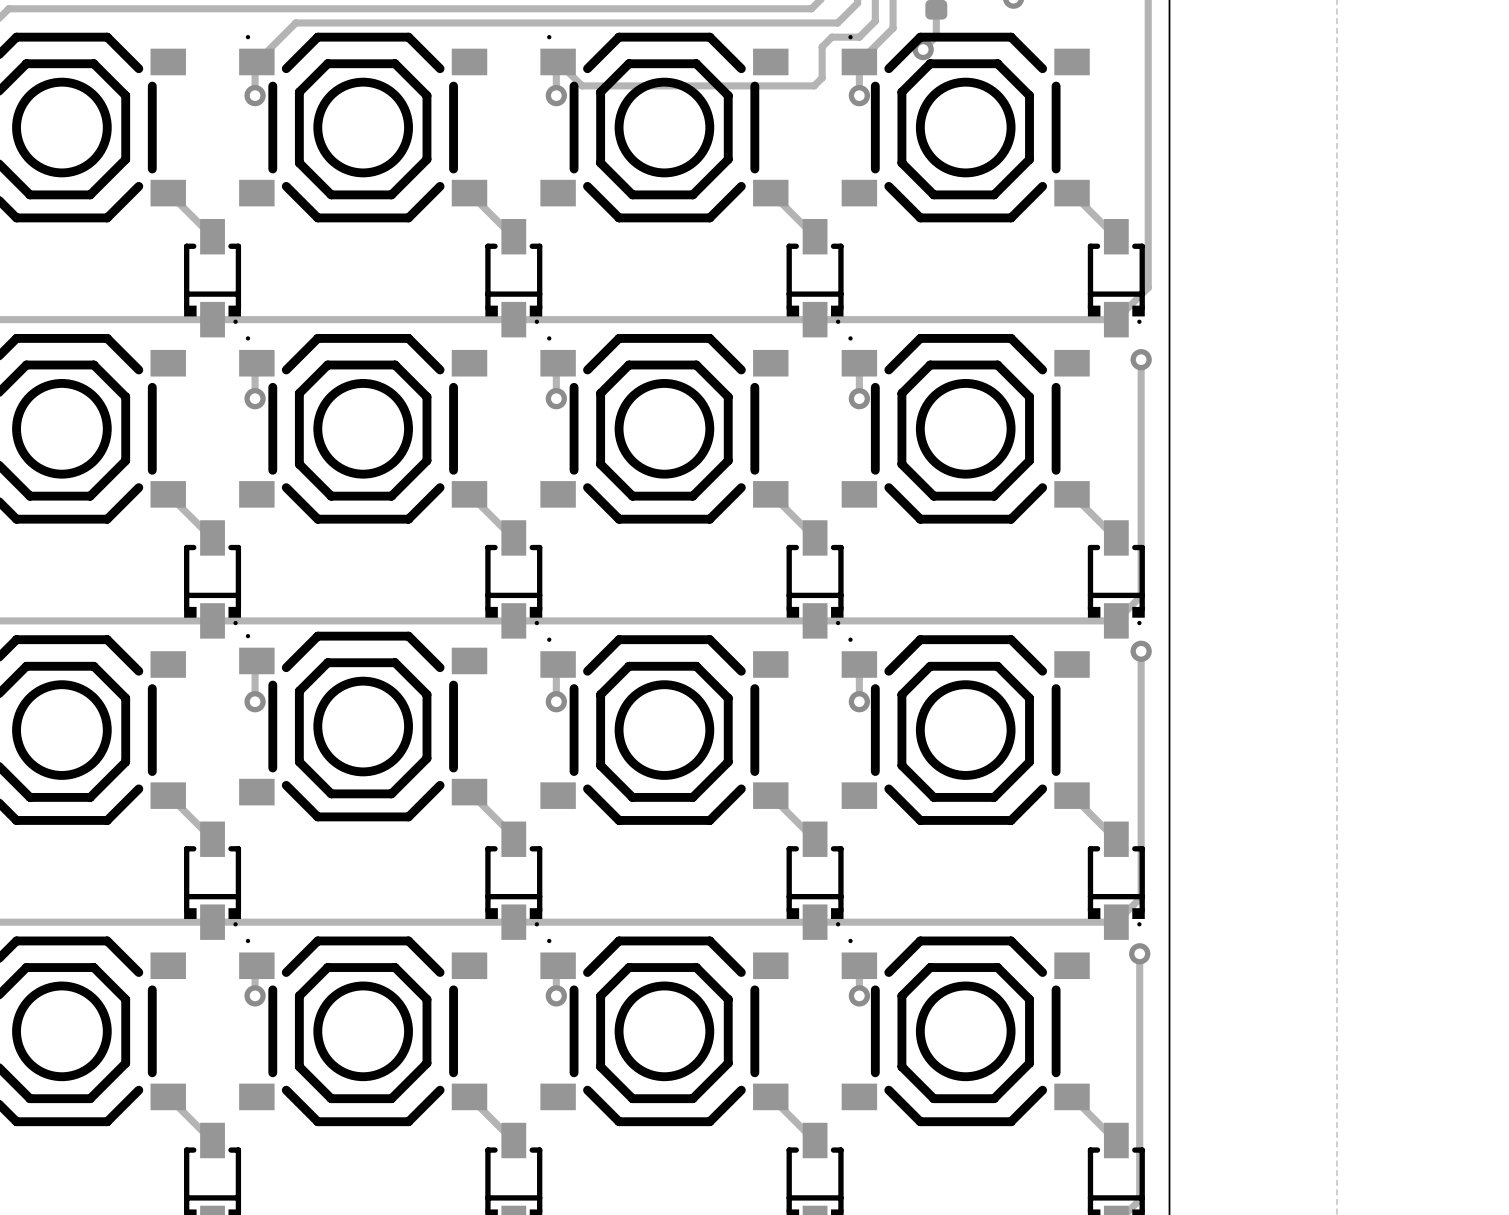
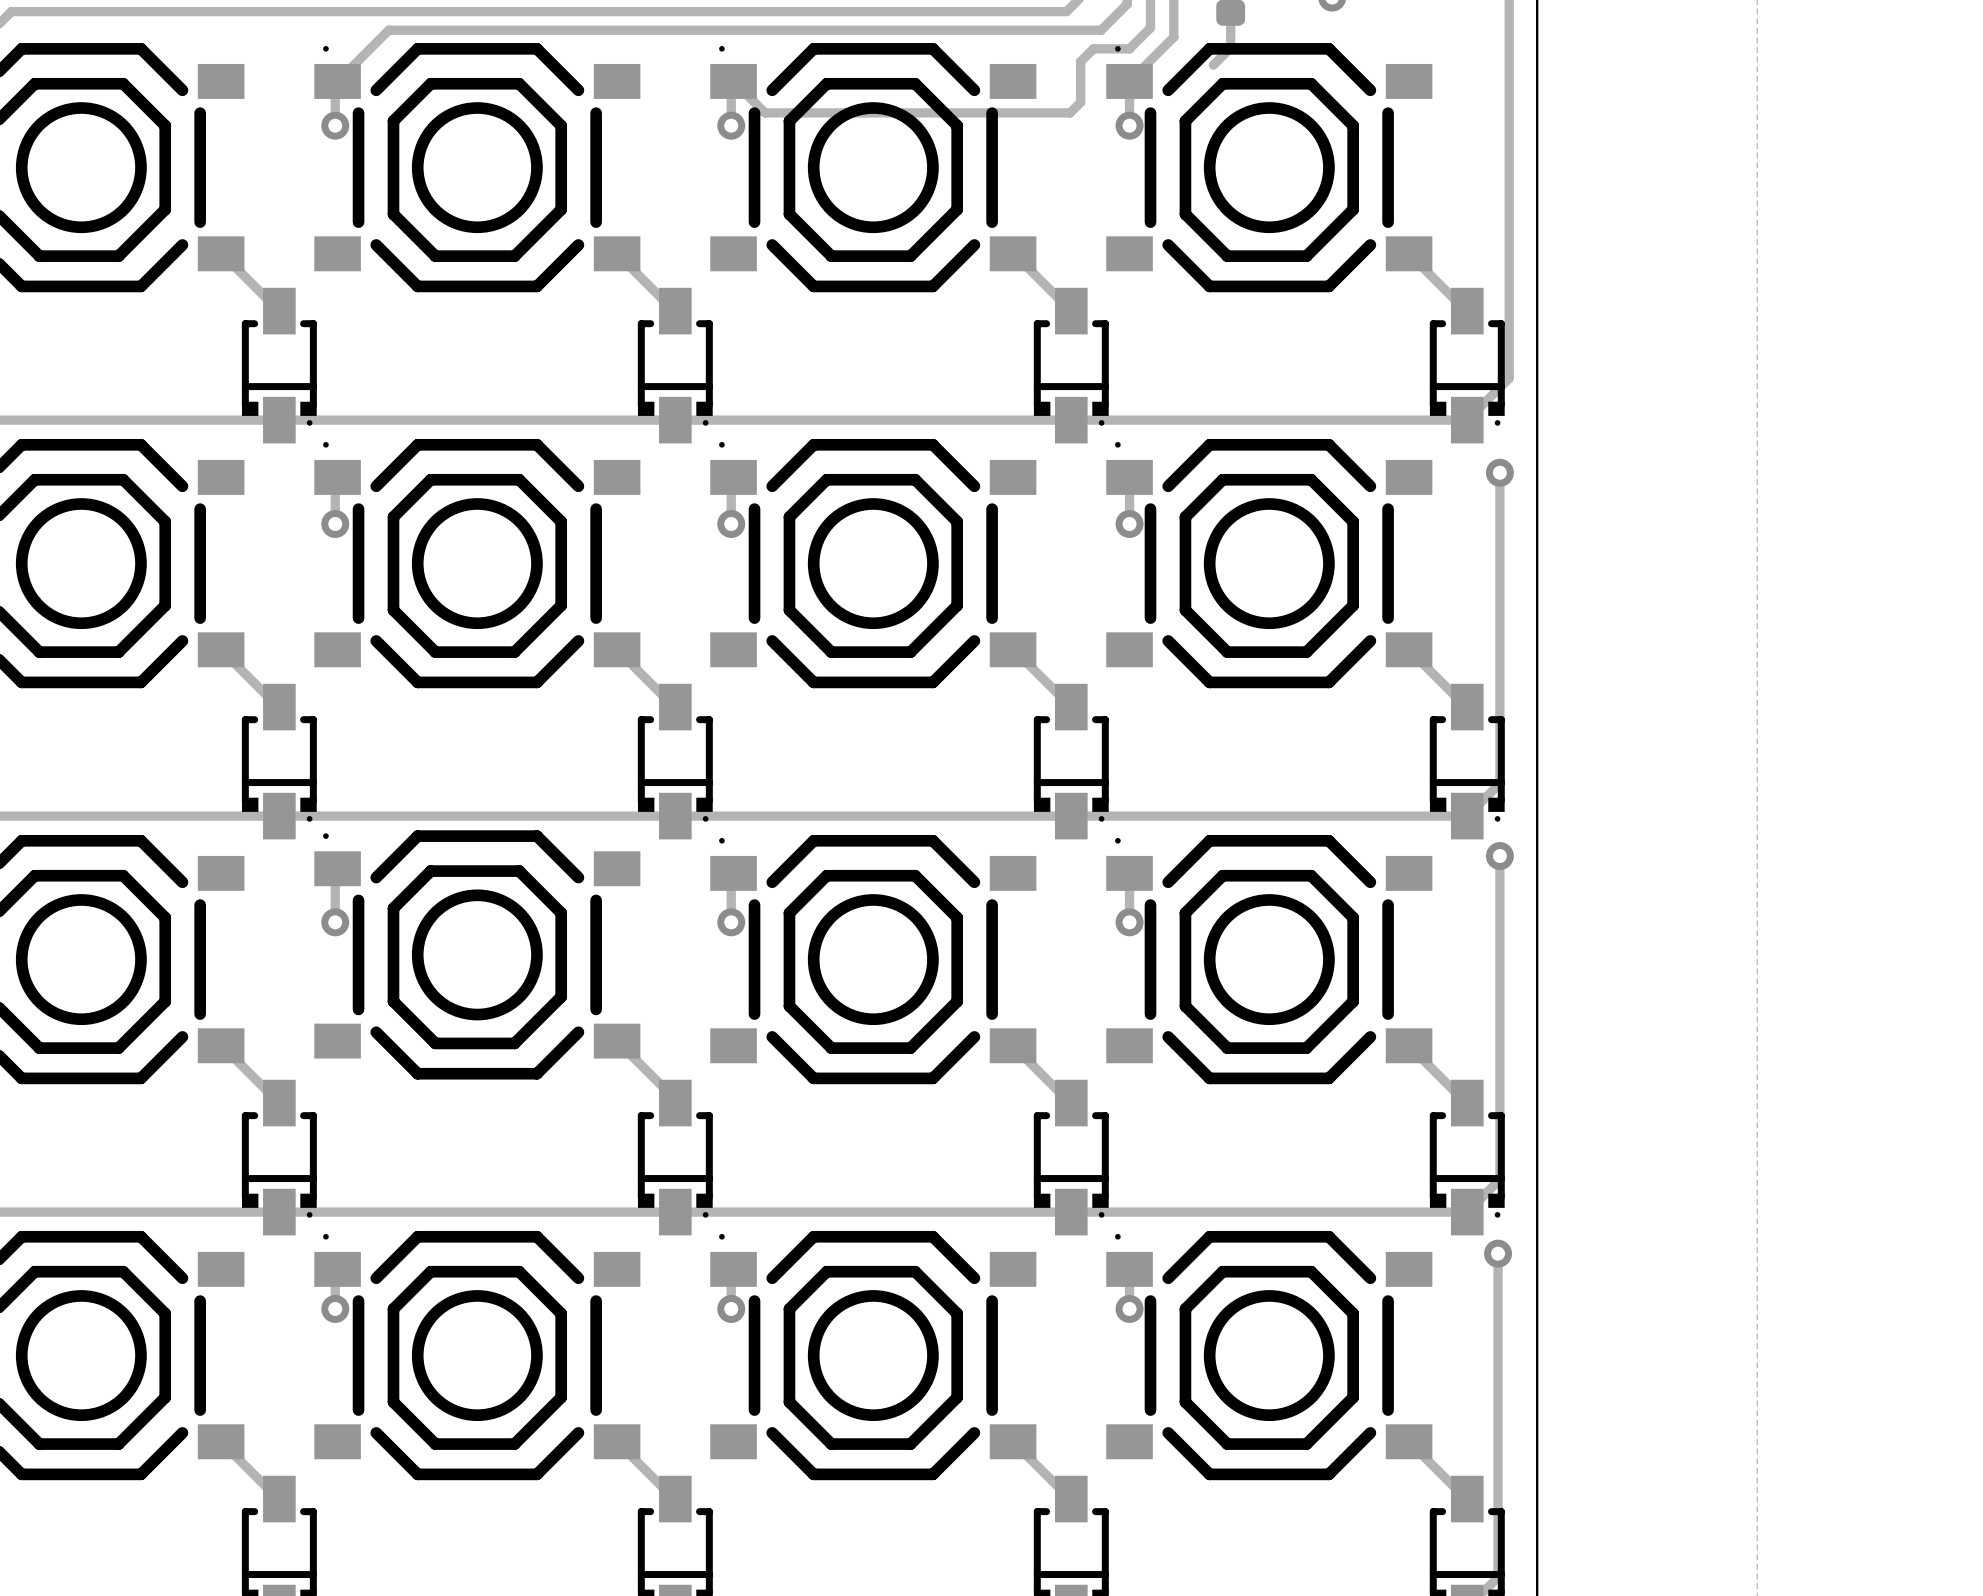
via: (923, 49) -> none

